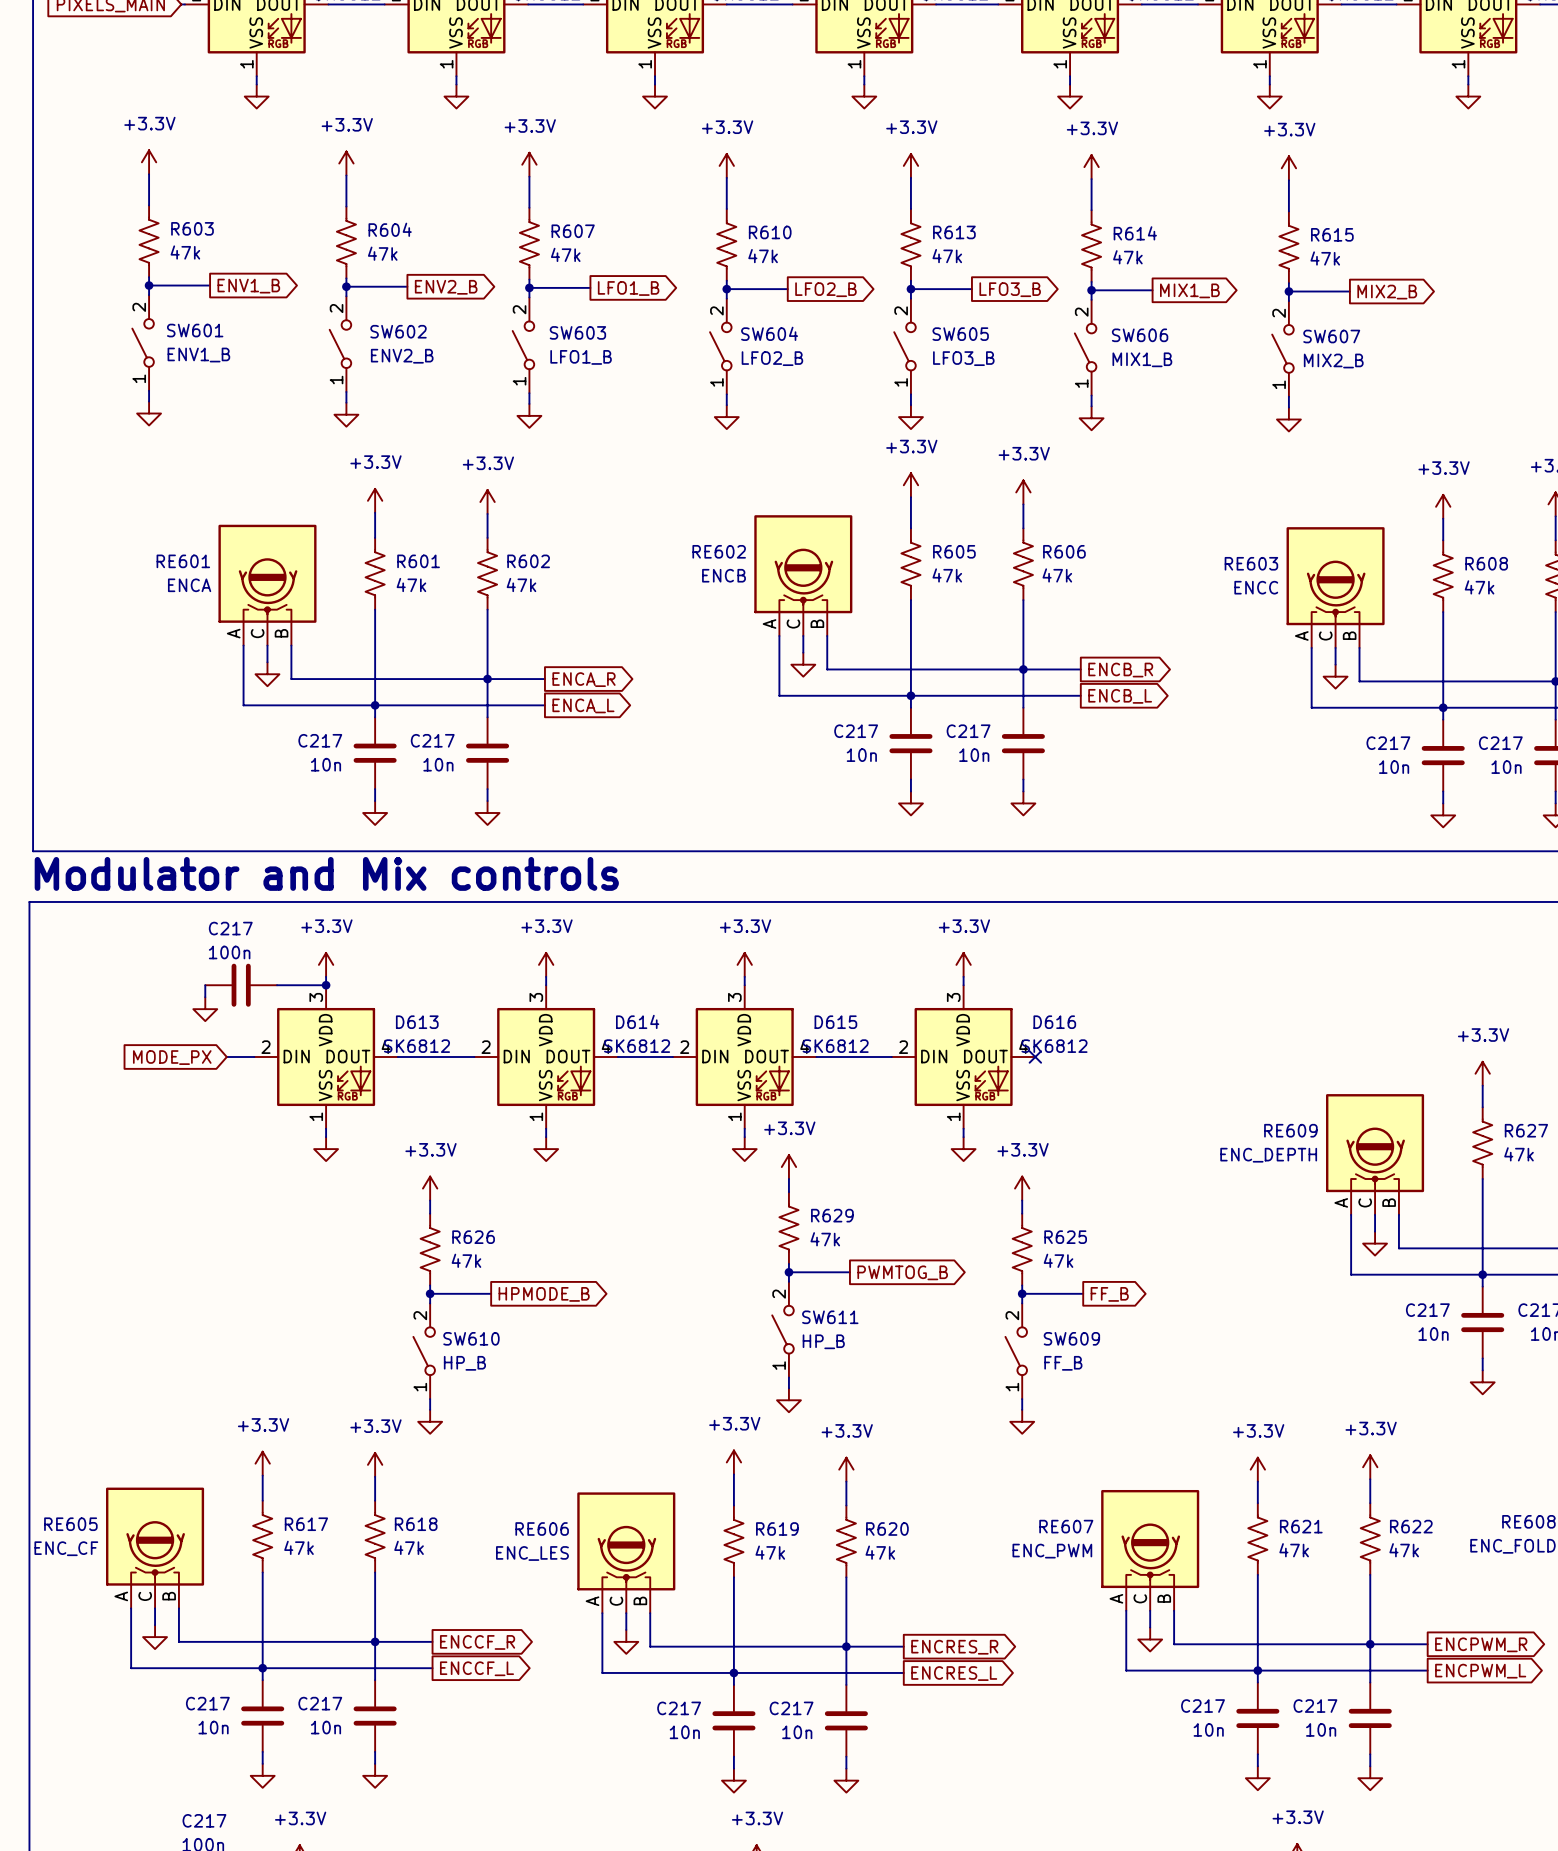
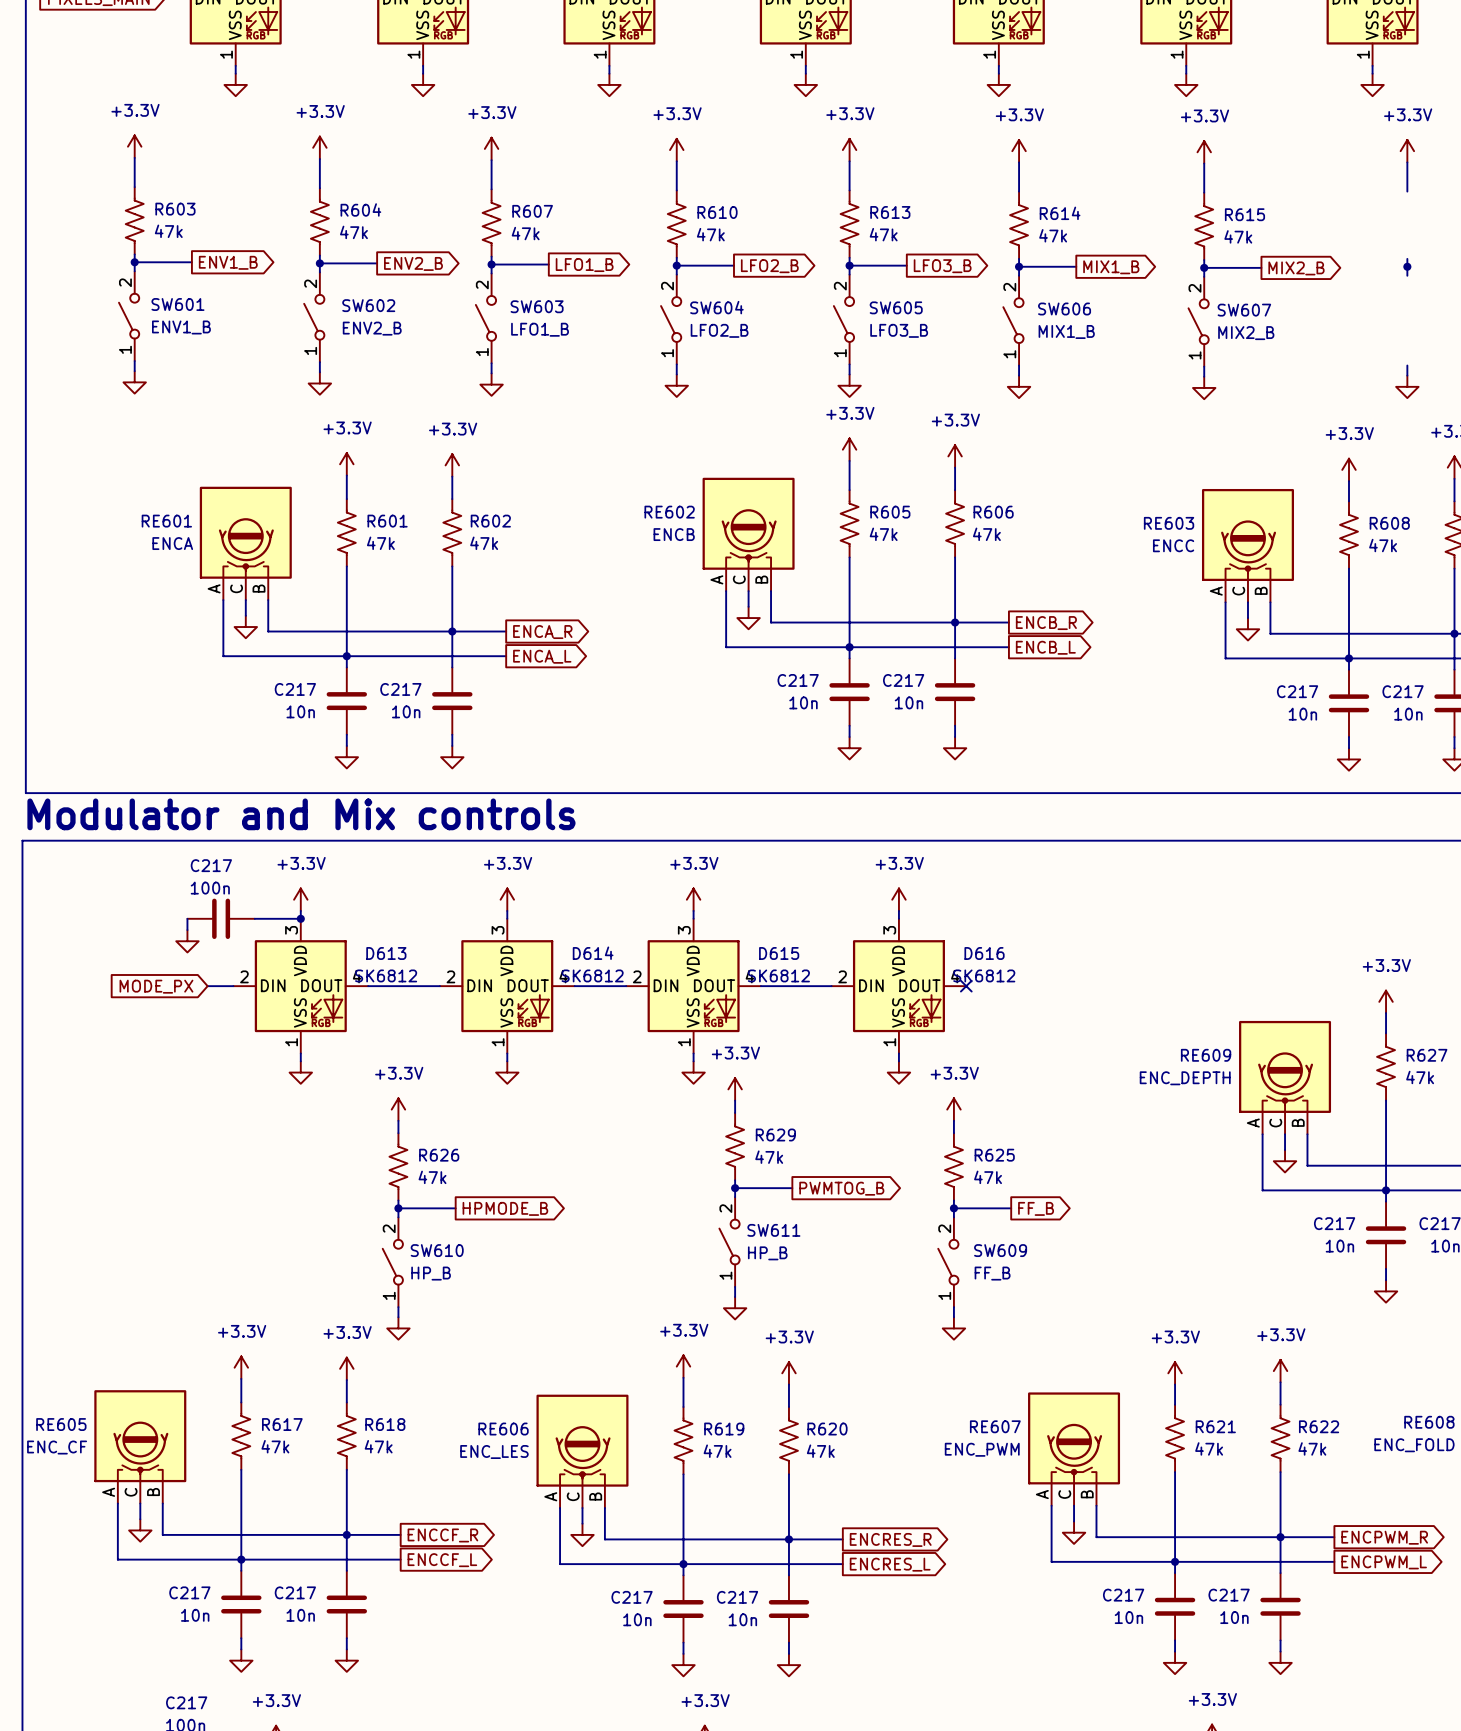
power symbol: none -> +3.3V (1407, 151)
wire: none -> (1407, 162) (1407, 191)
wire: none -> (1407, 258) (1407, 275)
junction: none -> (1407, 266)
wire: none -> (1407, 365) (1407, 375)
power symbol: none -> (1407, 386)

